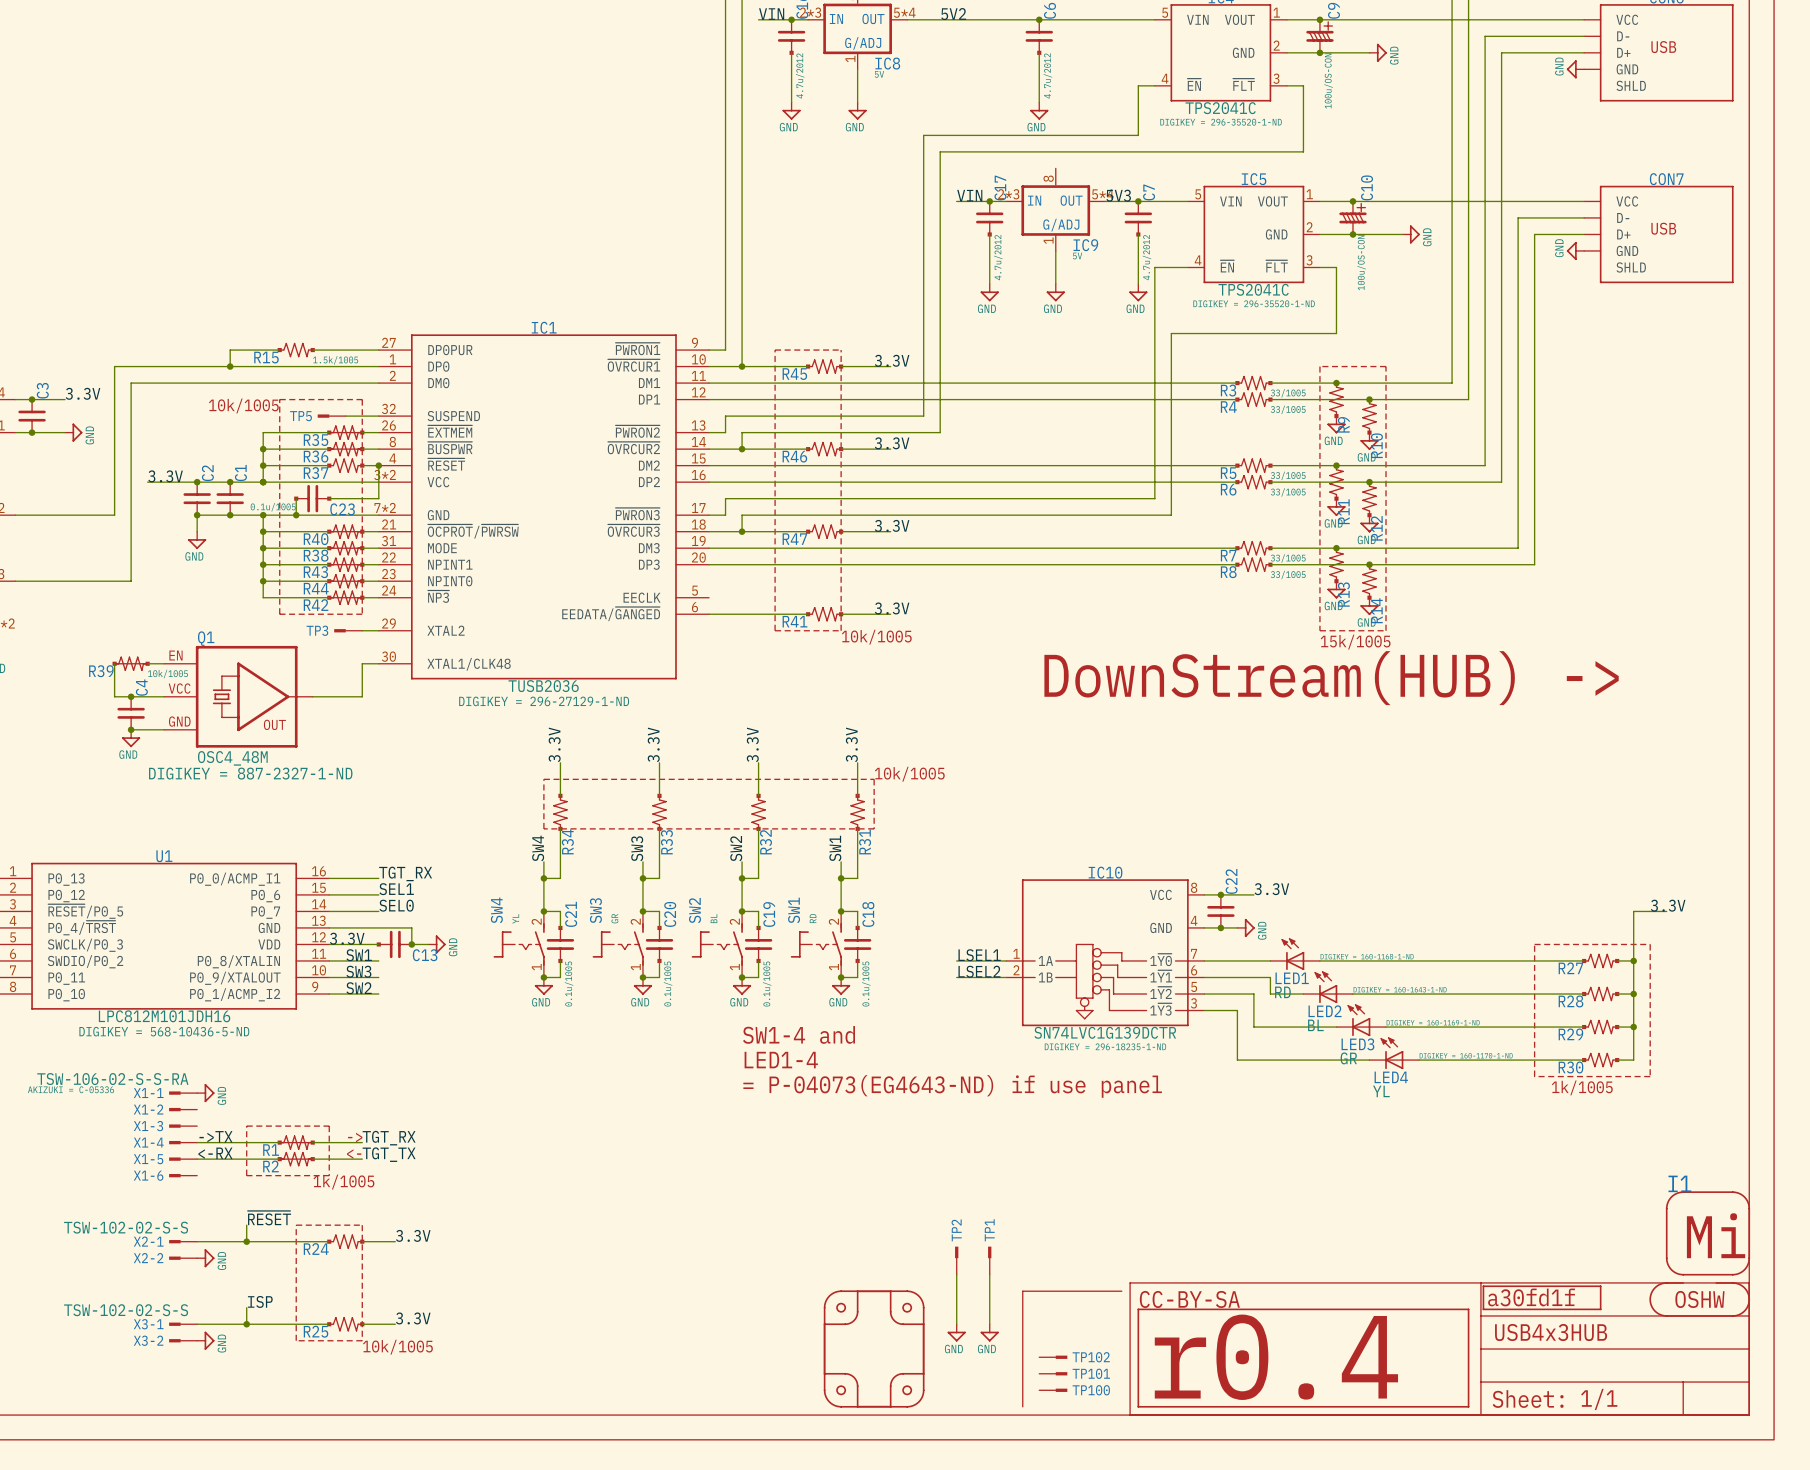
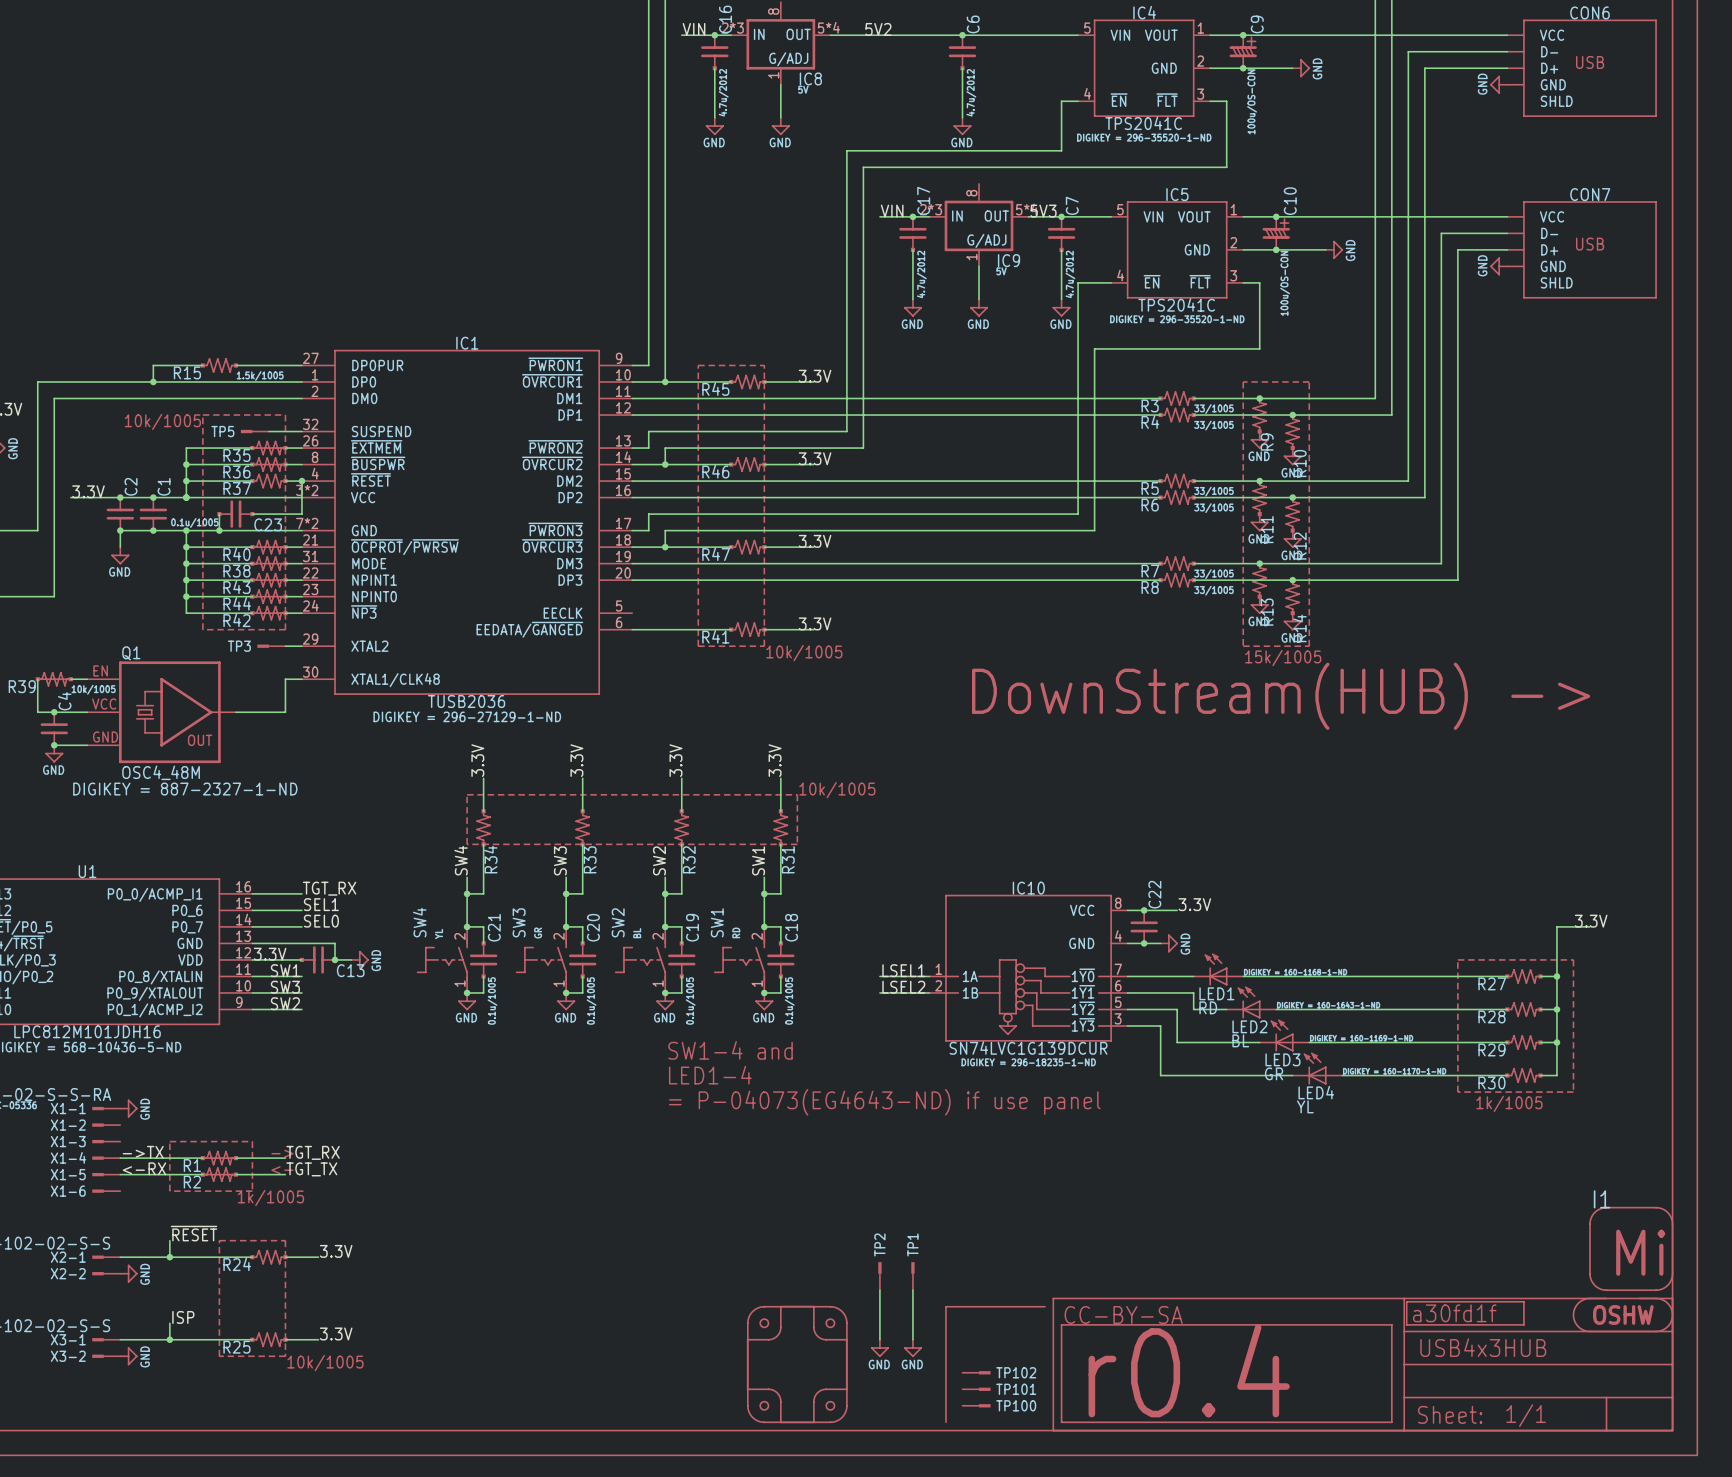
IC10 value: SN74LVC1G139DCTR (1105, 1032) -> SN74LVC1G139DCUR (1028, 1048)

